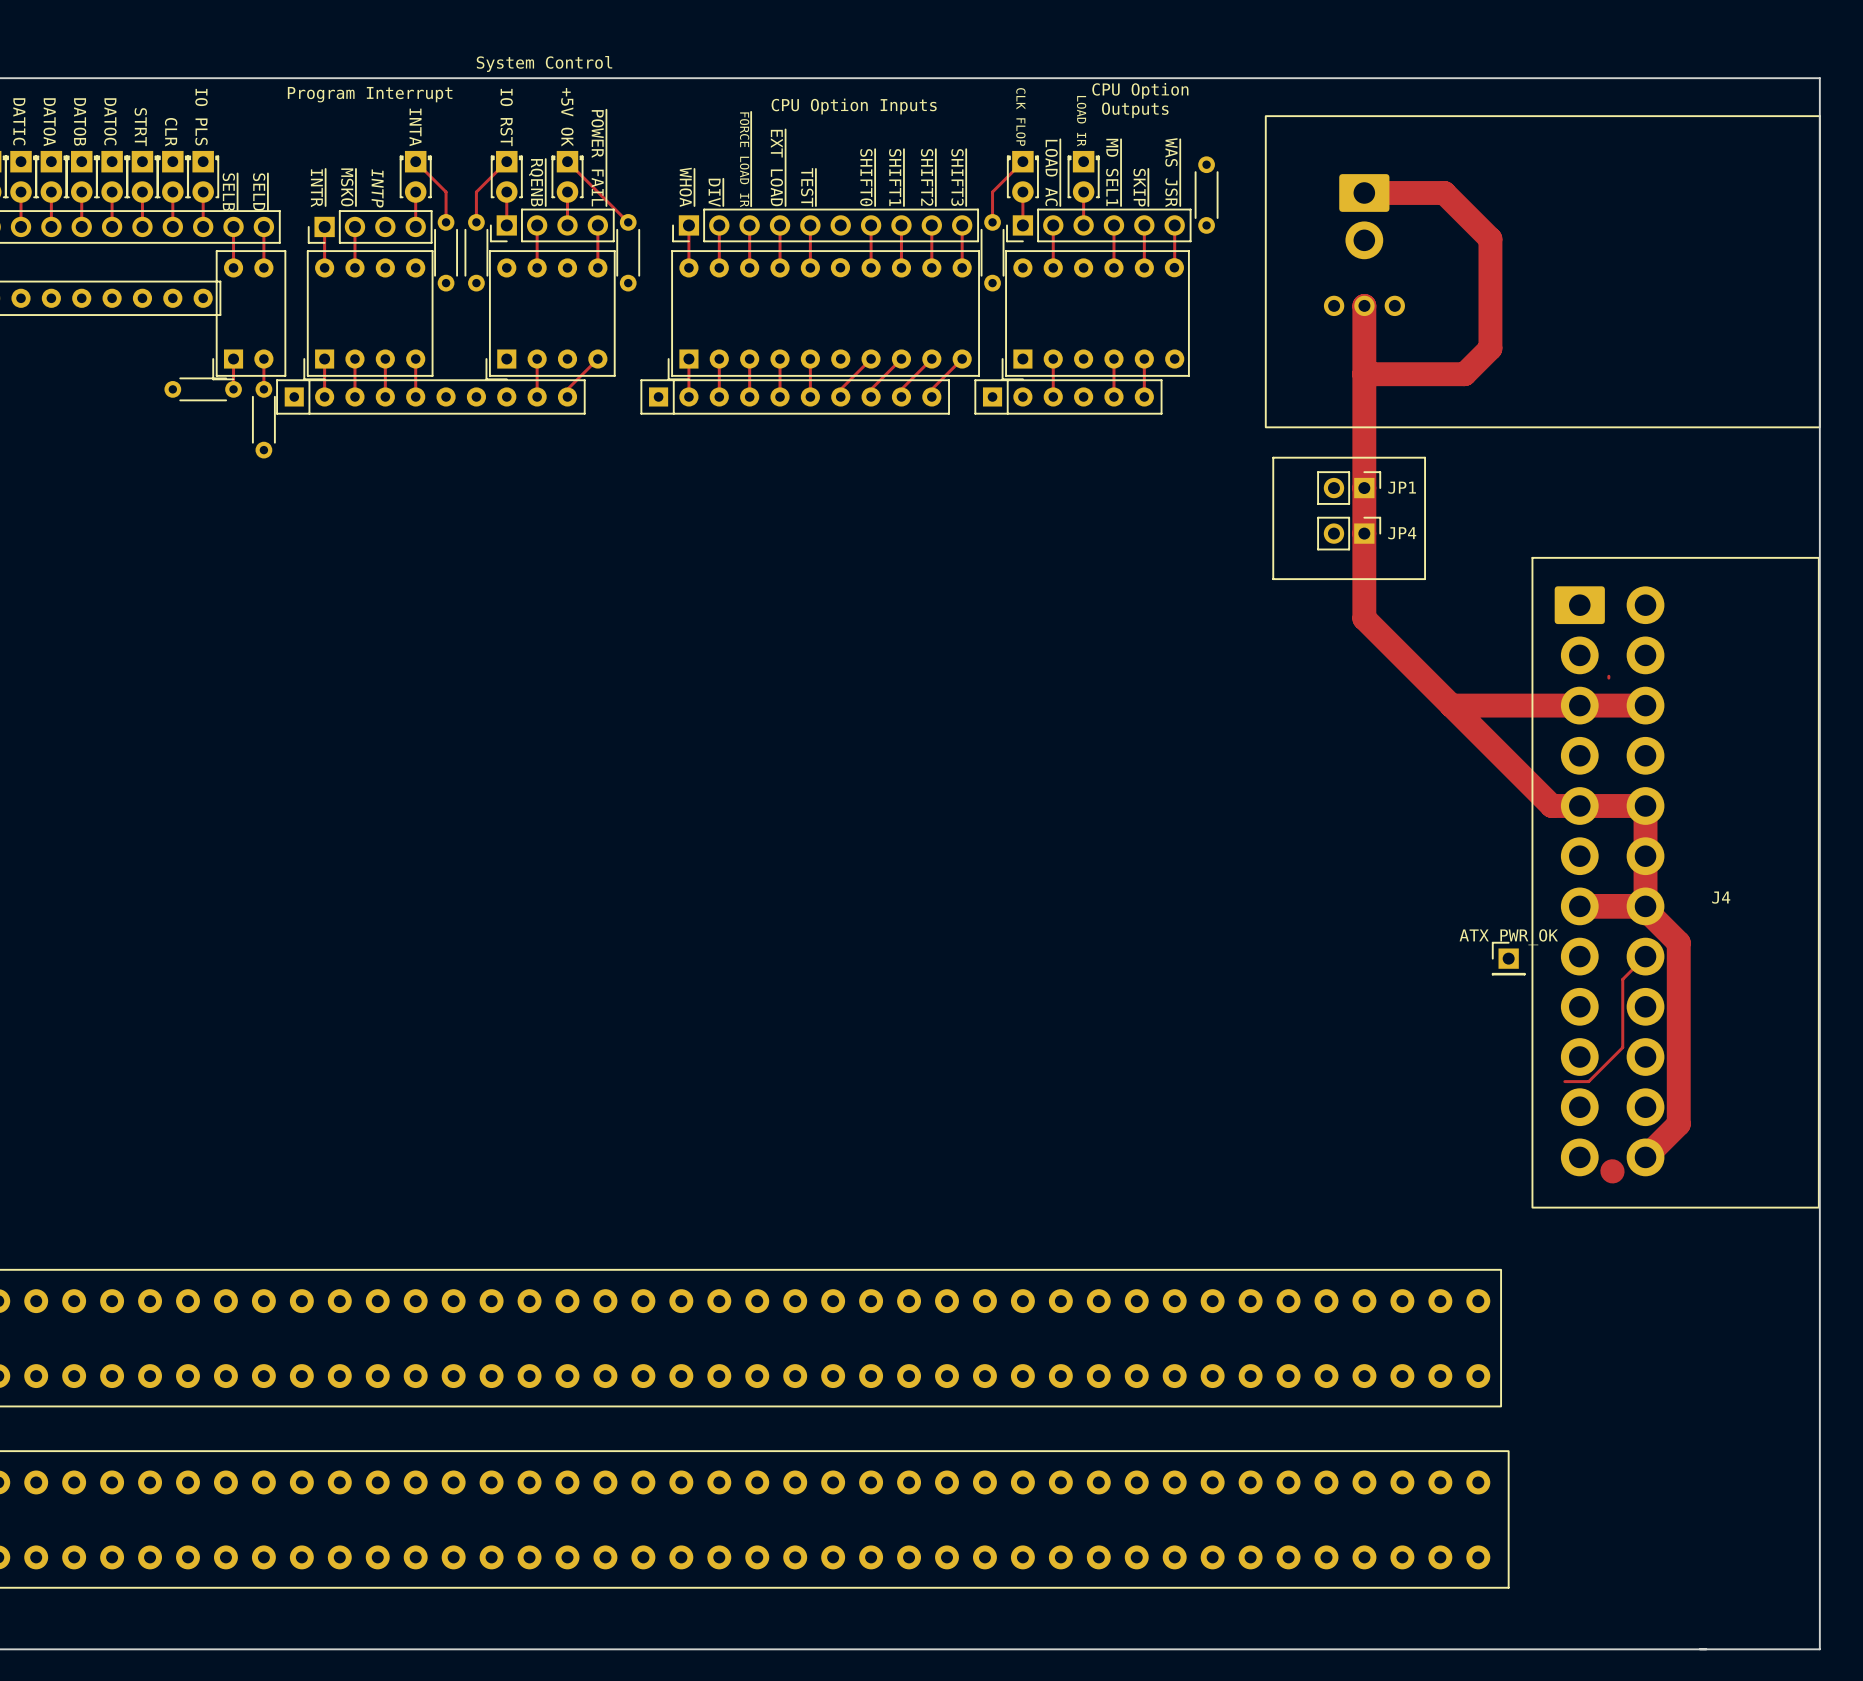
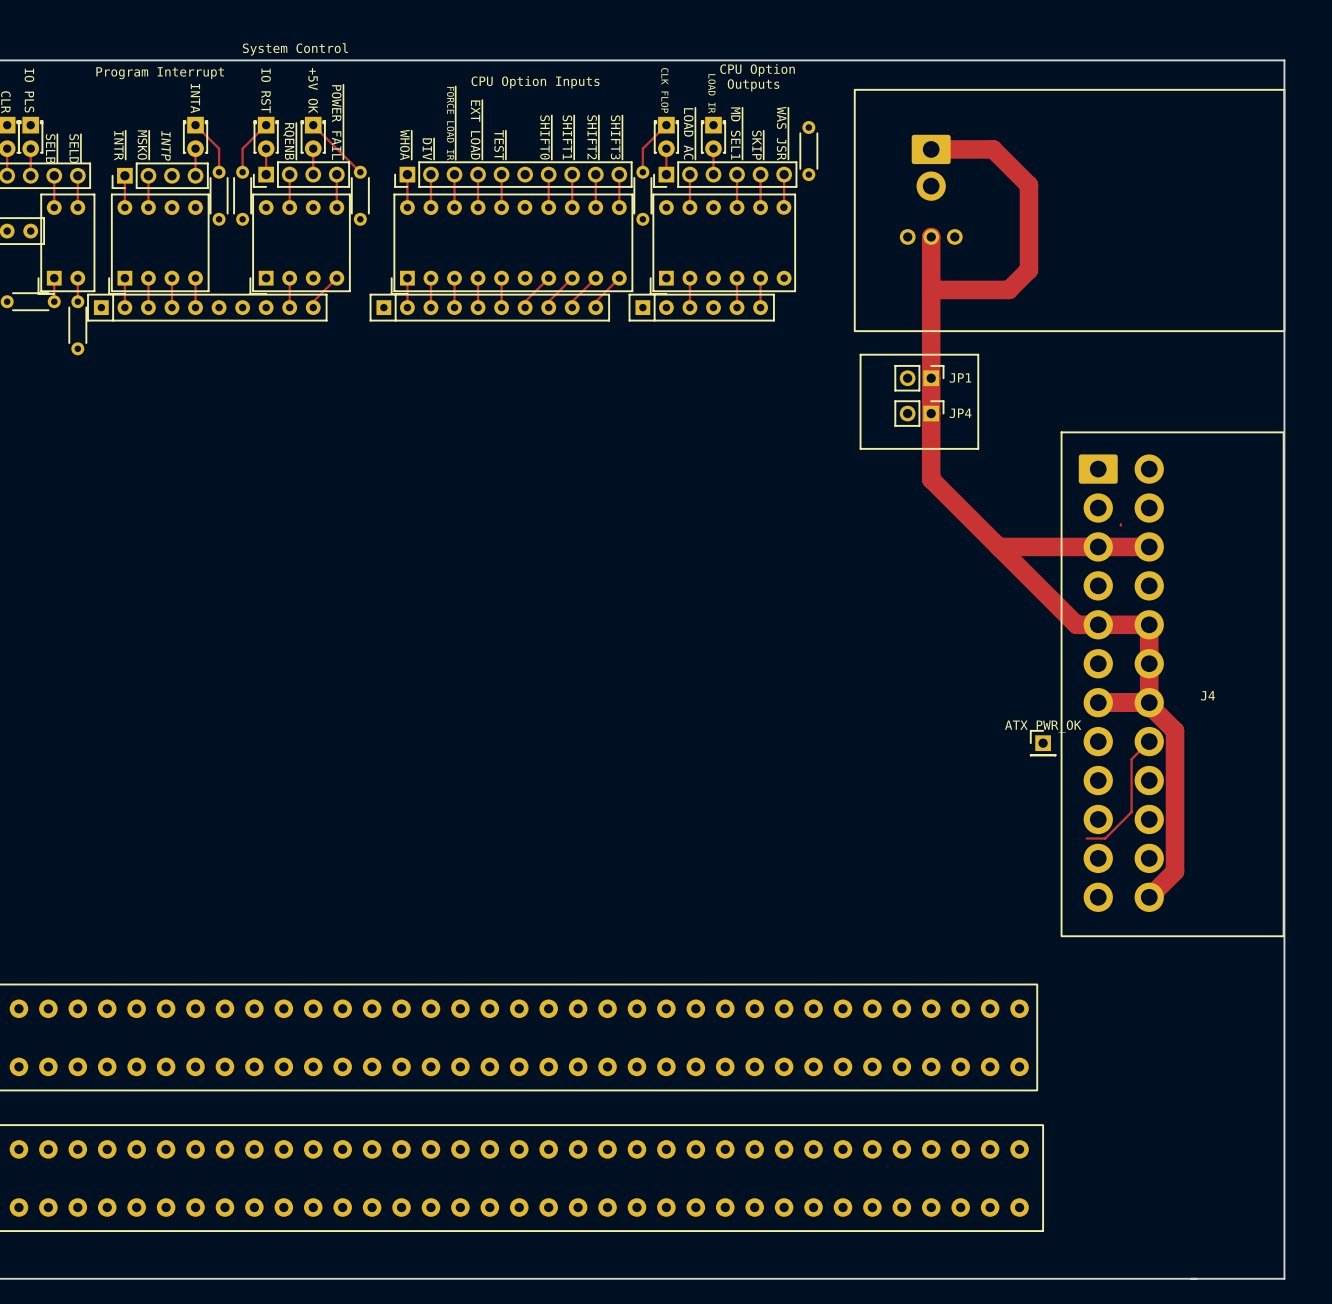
track: (1612, 1171) (1612, 1171) -> none

